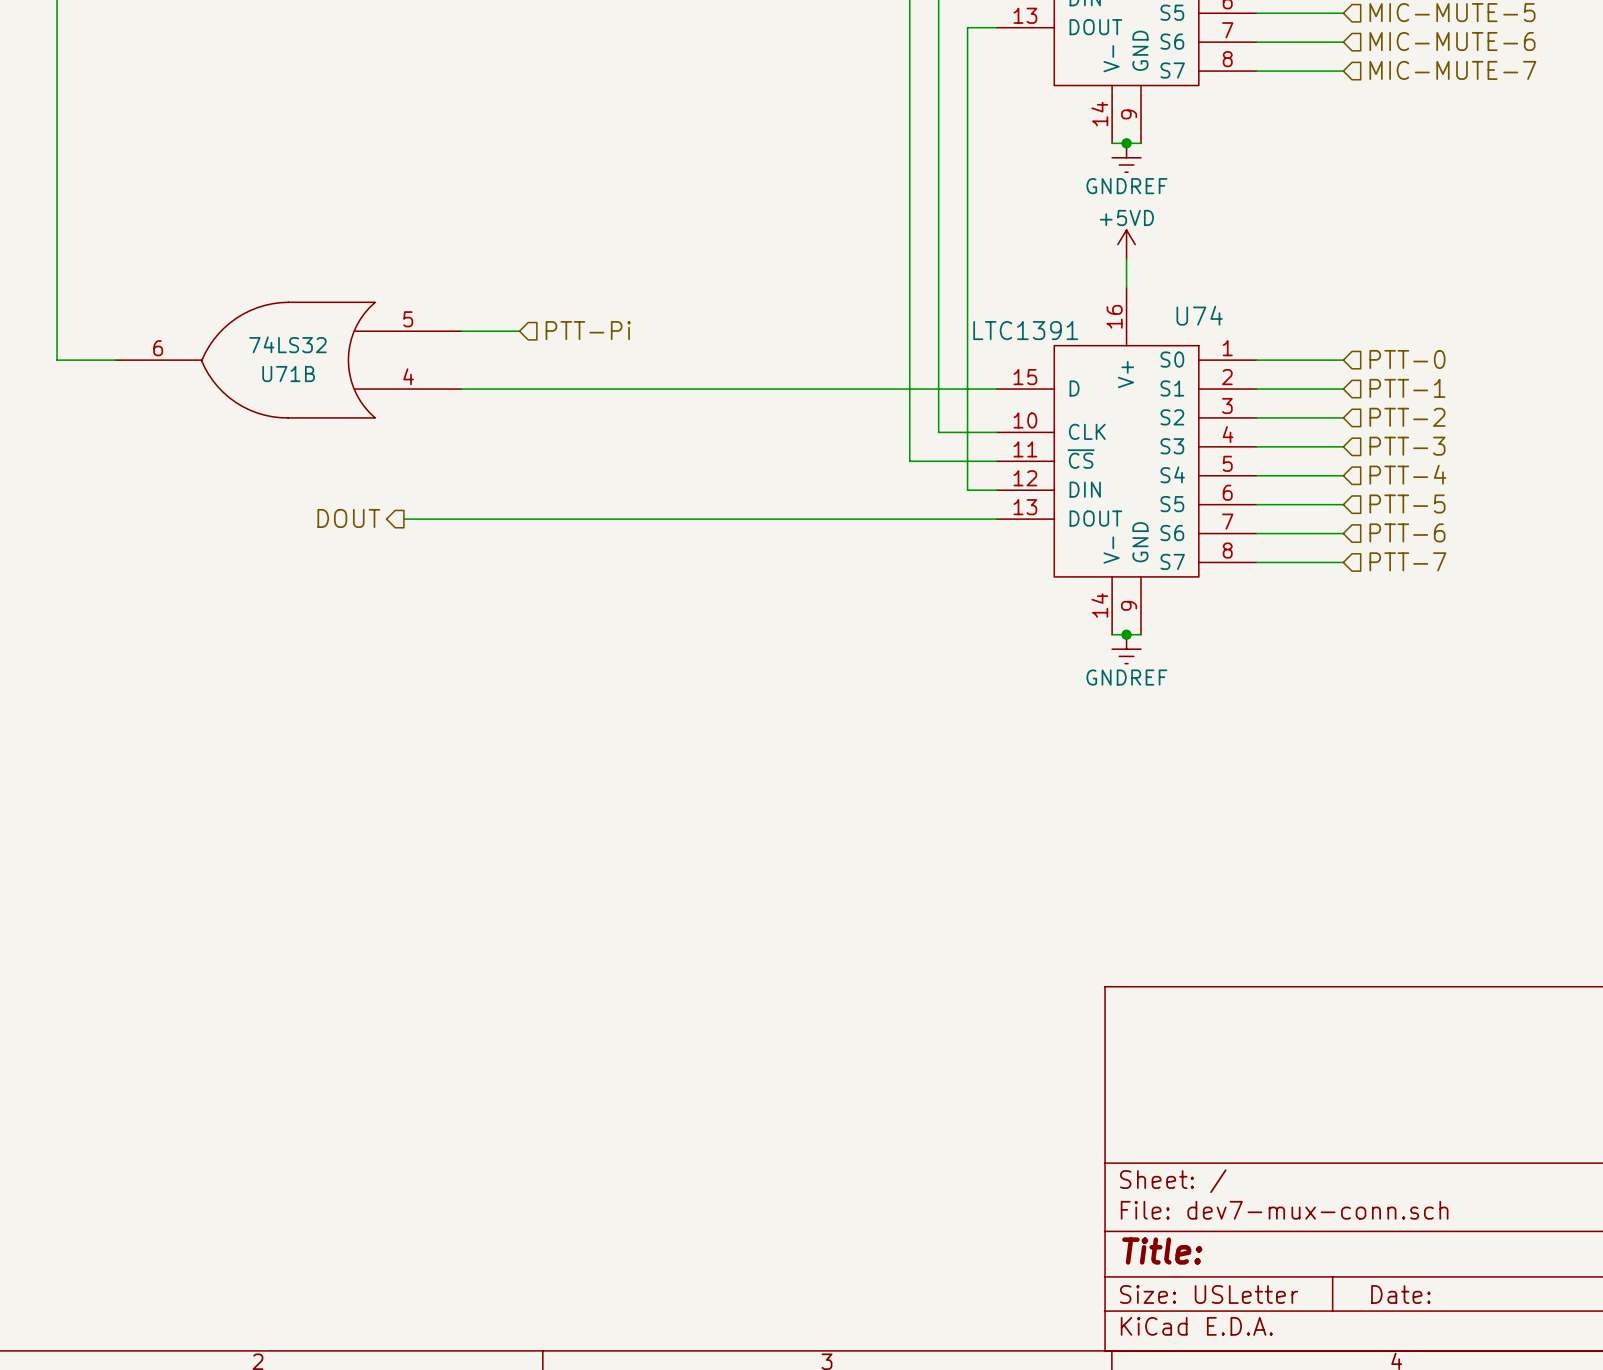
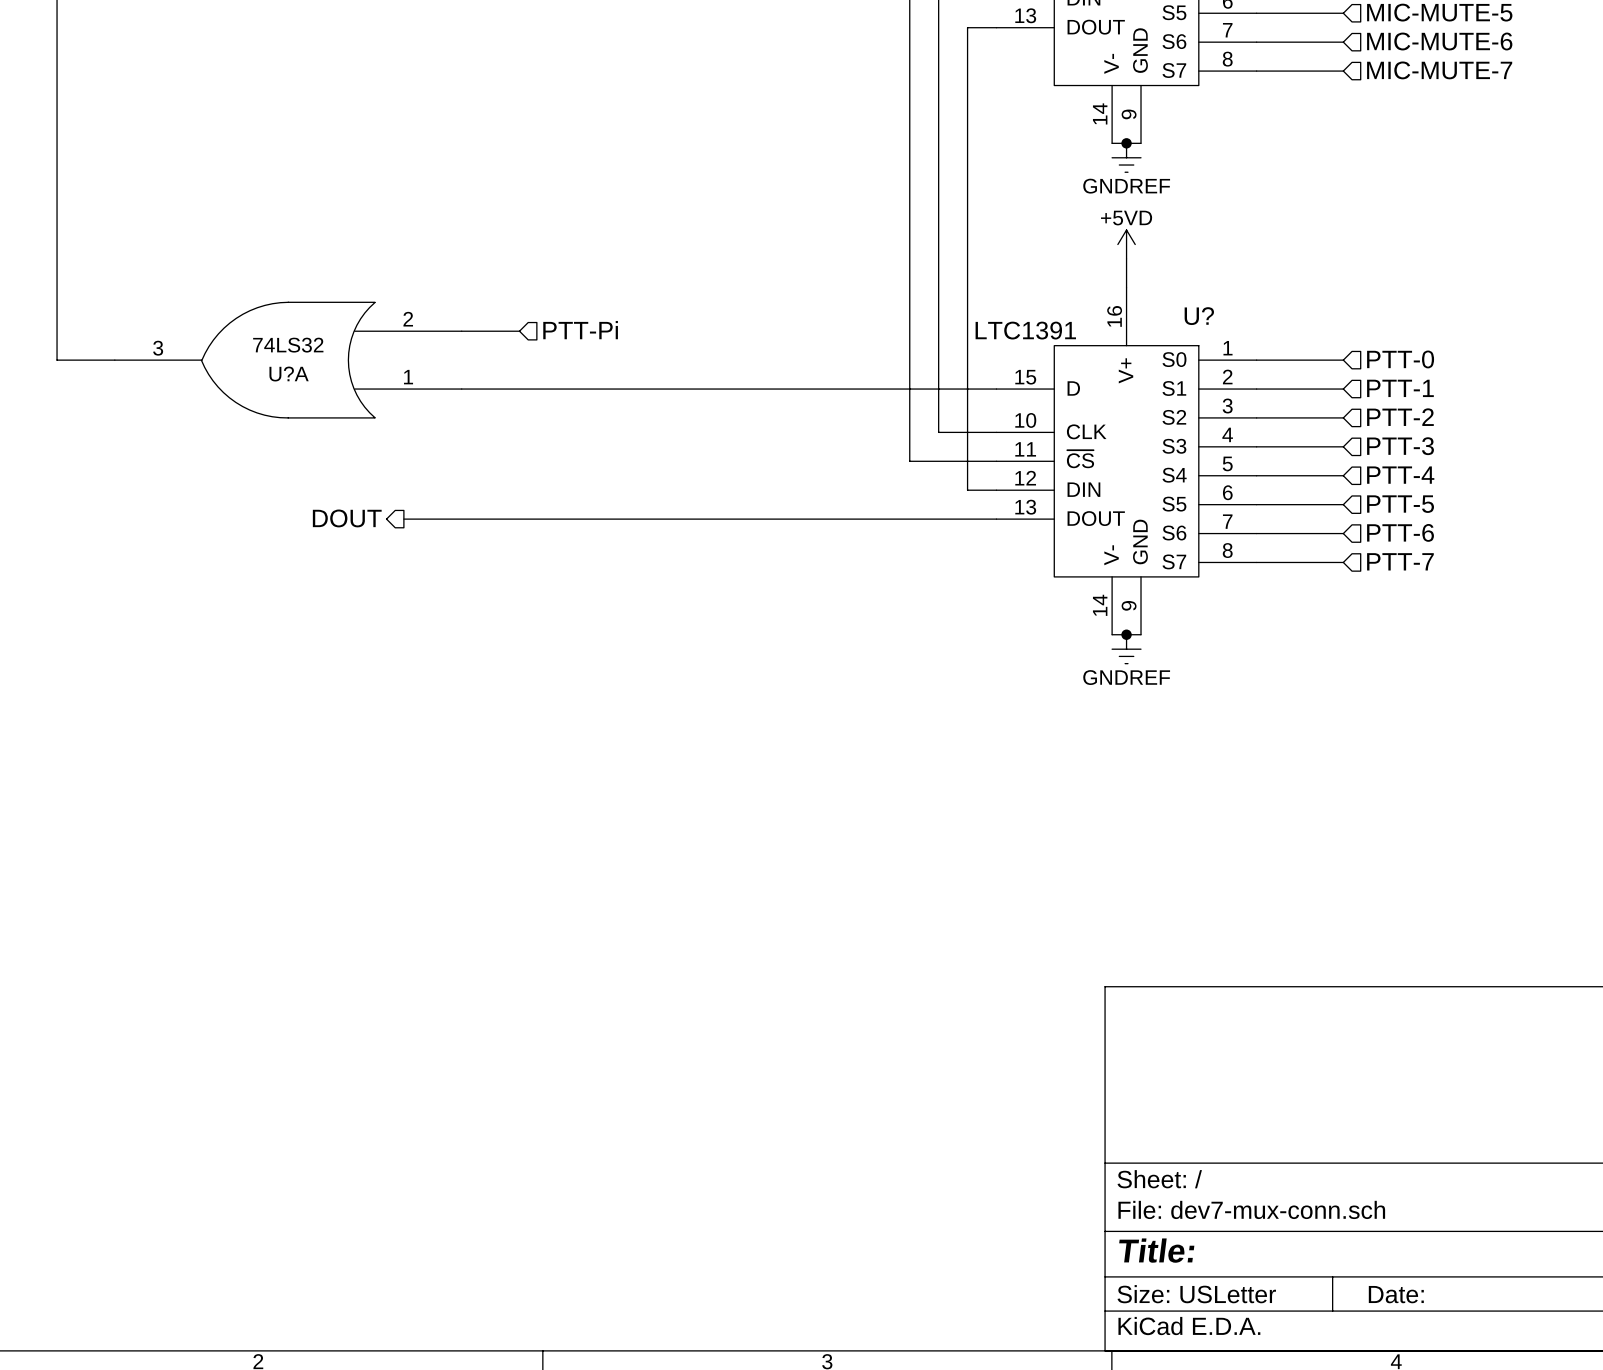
U74 name: U74 (1199, 315) -> U? (1199, 316)
U71B pin number: 5 (408, 319) -> 2 (408, 319)
U71B pin number: 6 (158, 348) -> 3 (158, 348)
U71B name: U71B (288, 374) -> U?A (289, 374)
U71B pin number: 4 (408, 376) -> 1 (408, 377)

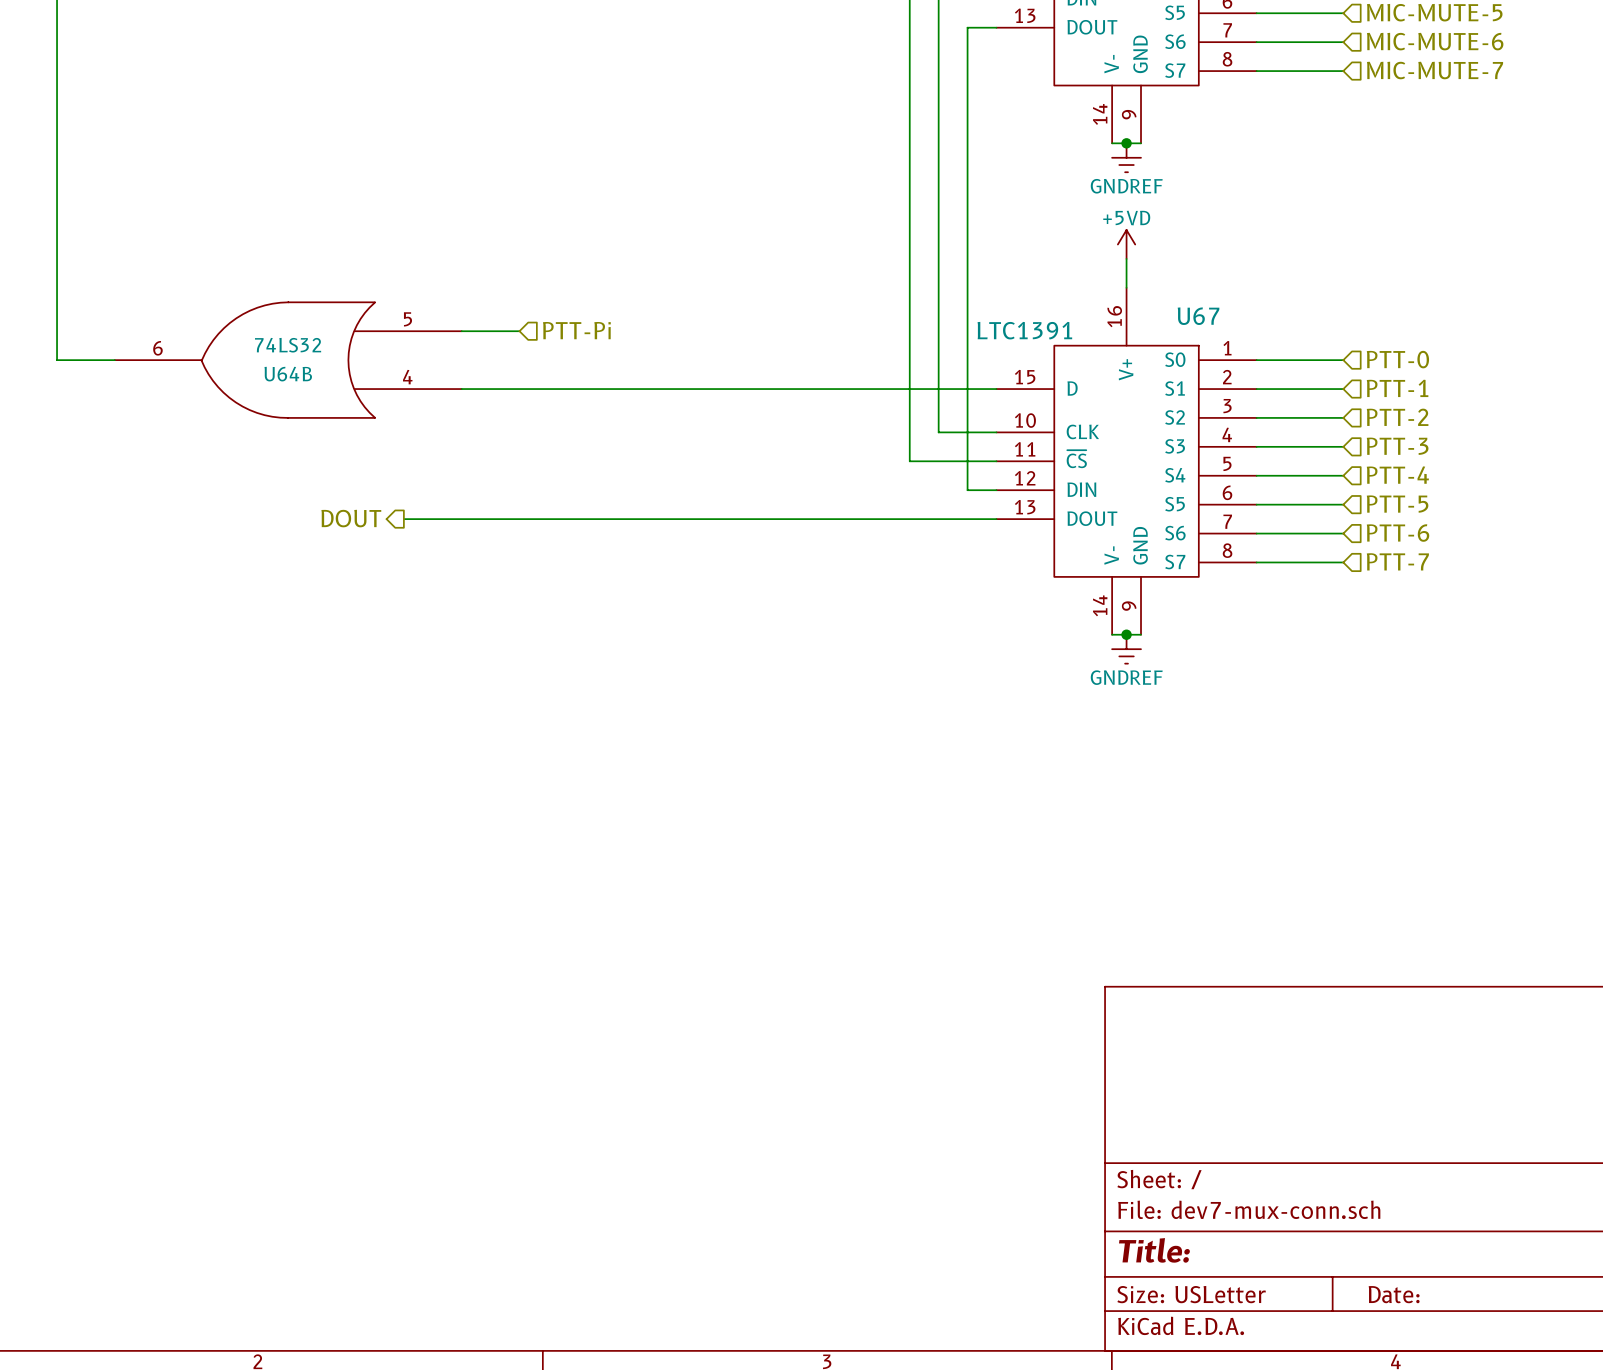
U? name: U? (1199, 316) -> U67 (1198, 316)
U?A pin number: 2 (408, 319) -> 5 (407, 319)
U?A pin number: 3 (158, 348) -> 6 (157, 348)
U?A name: U?A (289, 374) -> U64B (288, 374)
U?A pin number: 1 (408, 377) -> 4 (407, 377)

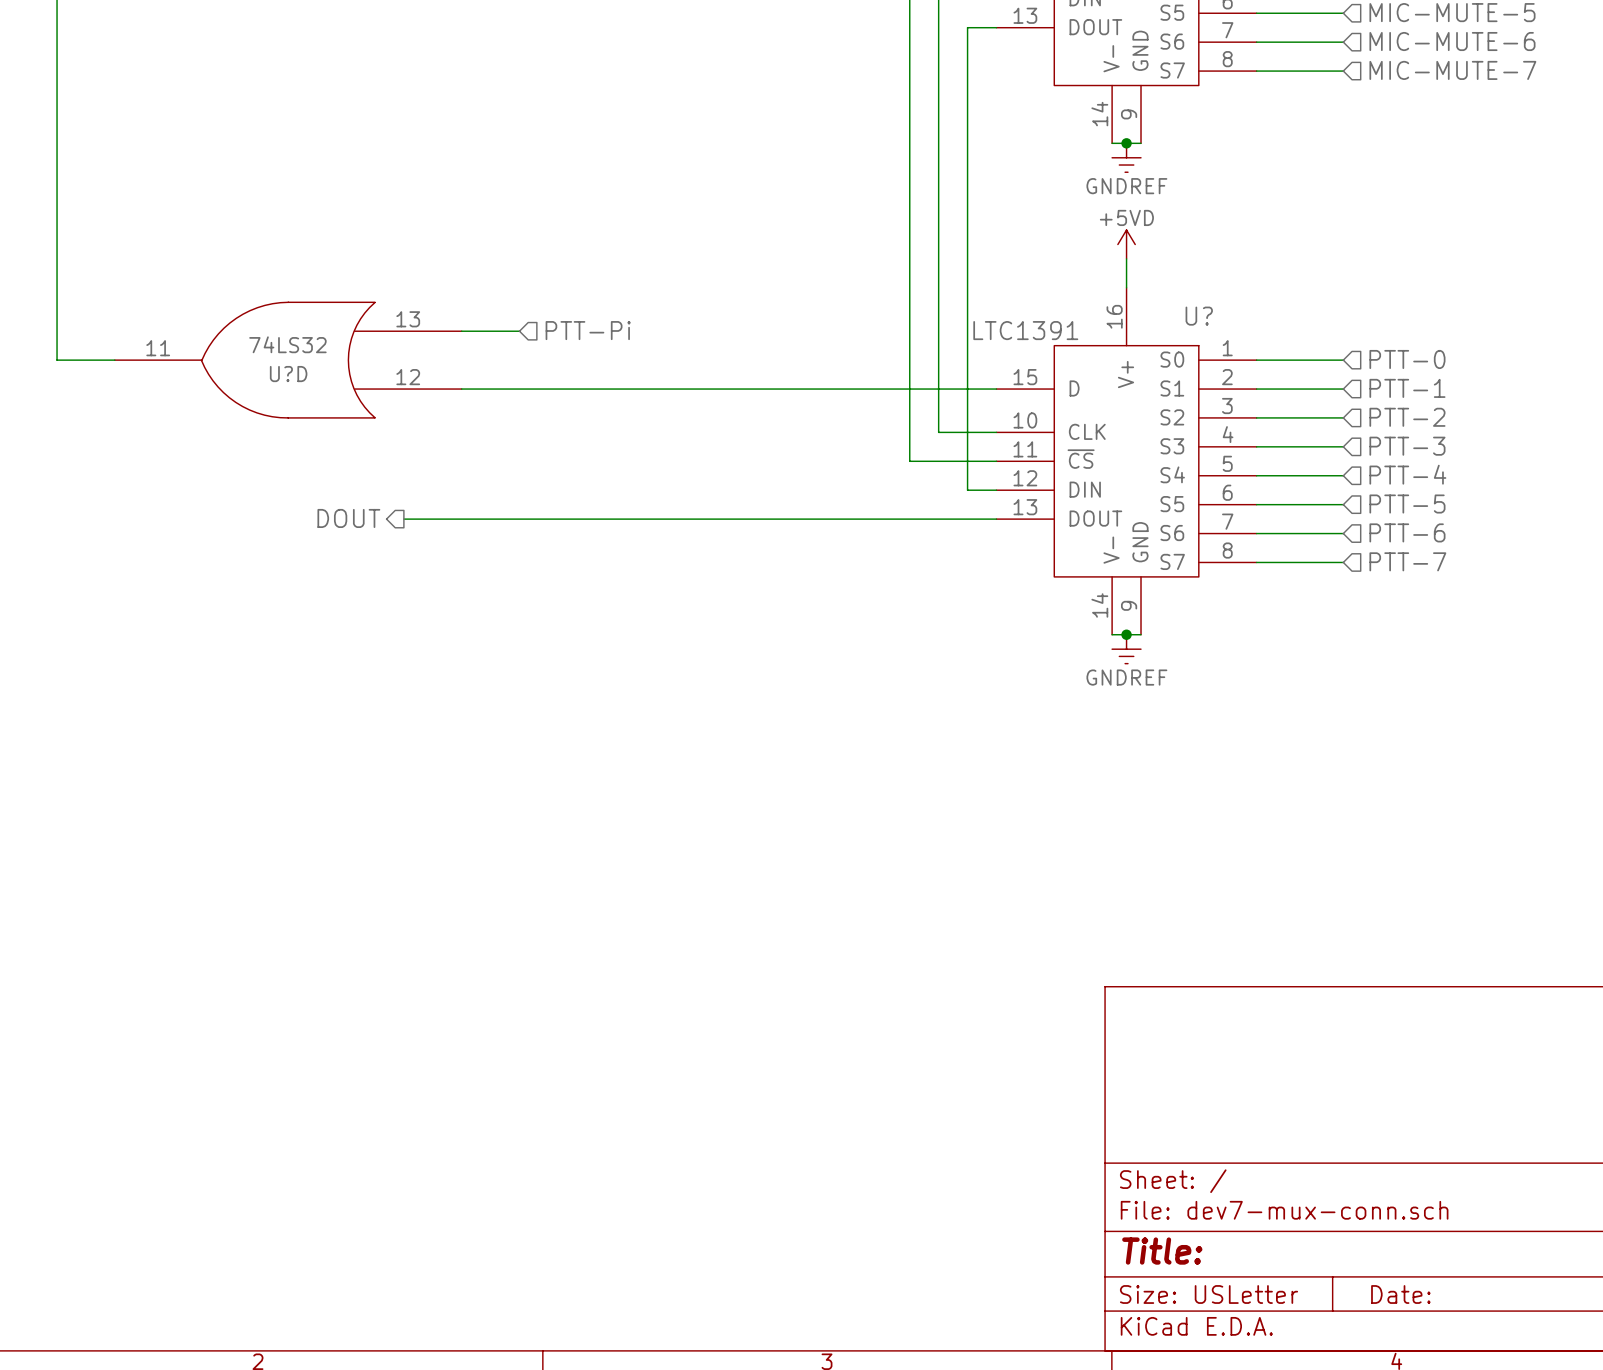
U67 name: U67 (1198, 316) -> U? (1199, 316)
U64B pin number: 5 (407, 319) -> 13 (408, 319)
U64B pin number: 6 (157, 348) -> 11 (158, 348)
U64B name: U64B (288, 374) -> U?D (288, 374)
U64B pin number: 4 (407, 377) -> 12 (408, 377)

